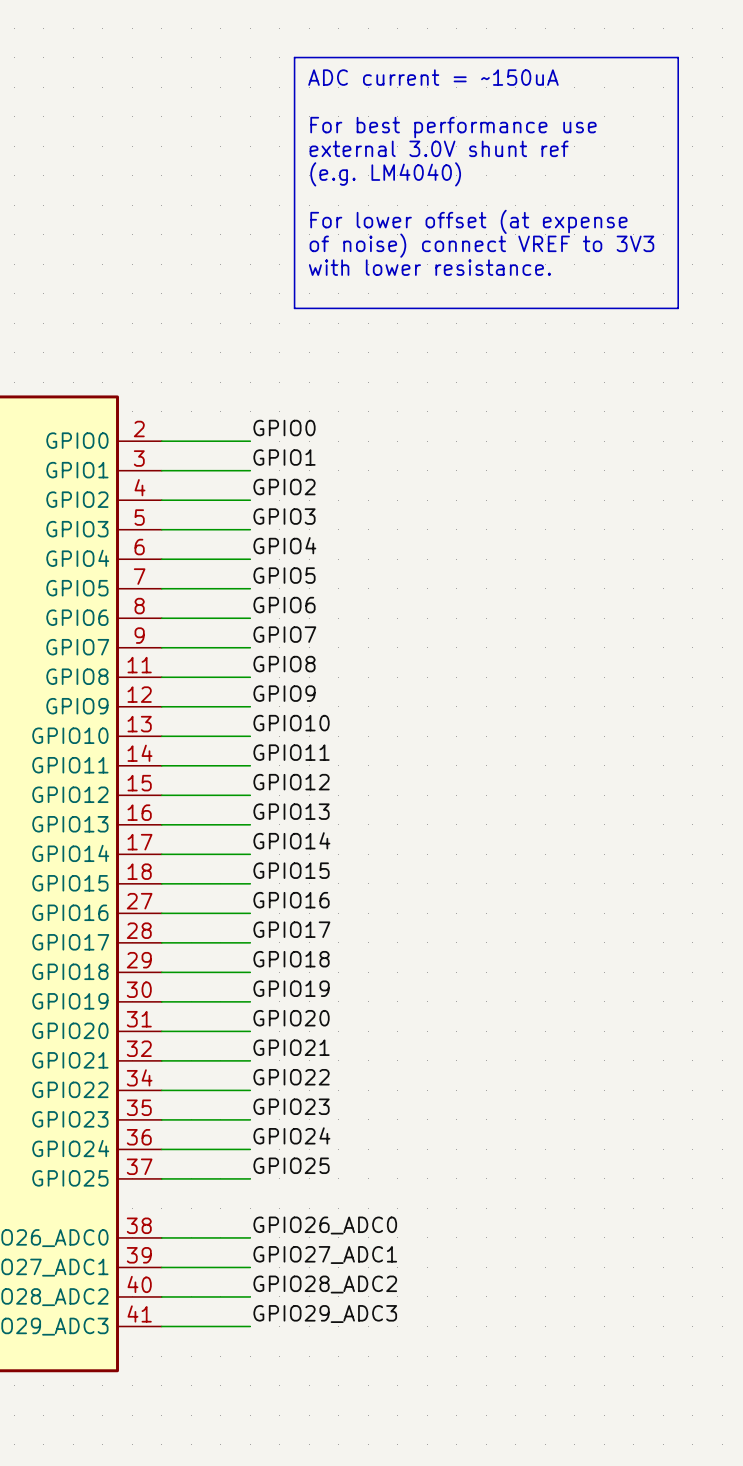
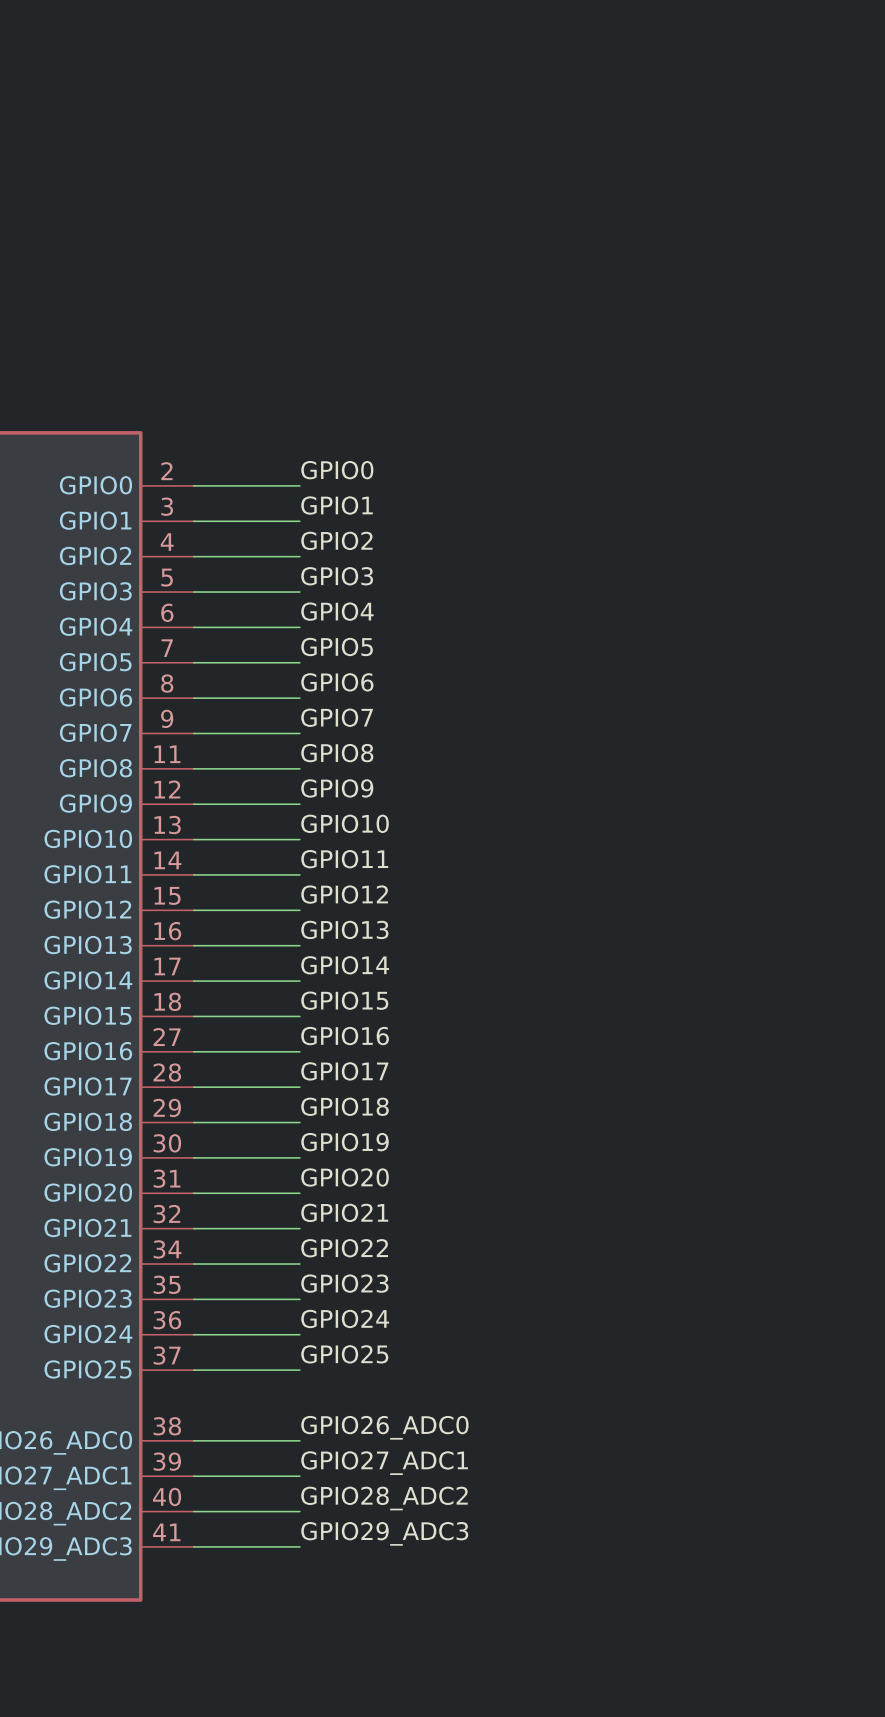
line: (294, 57) (678, 57) (678, 308) (294, 308) (294, 57) -> none
text: ADC current = ~150uA (433, 77) -> none
text: For best performance use (453, 127) -> none
text: external 3.0V shunt ref (439, 148) -> none
text: (e.g. LM4040) (385, 174) -> none
text: For lower offset (at expense (468, 221) -> none
text: of noise) connect VREF to 3V3 (481, 245) -> none
text: with lower resistance. (429, 267) -> none

